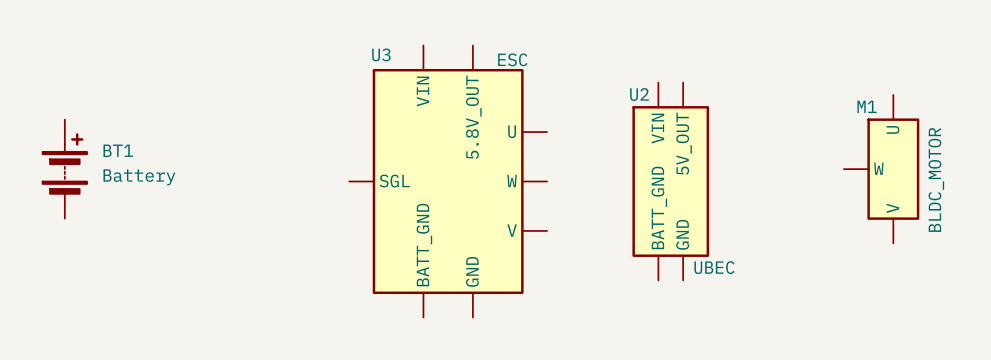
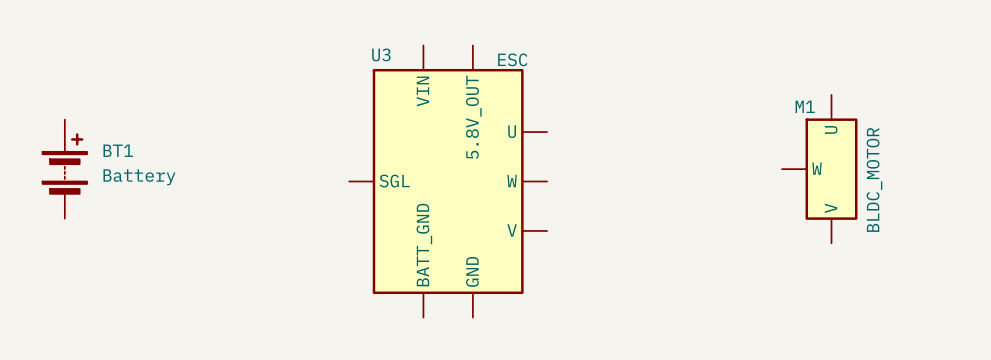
M1 position: (881, 169) -> (819, 169)
U2: UBEC (670, 181) -> none

